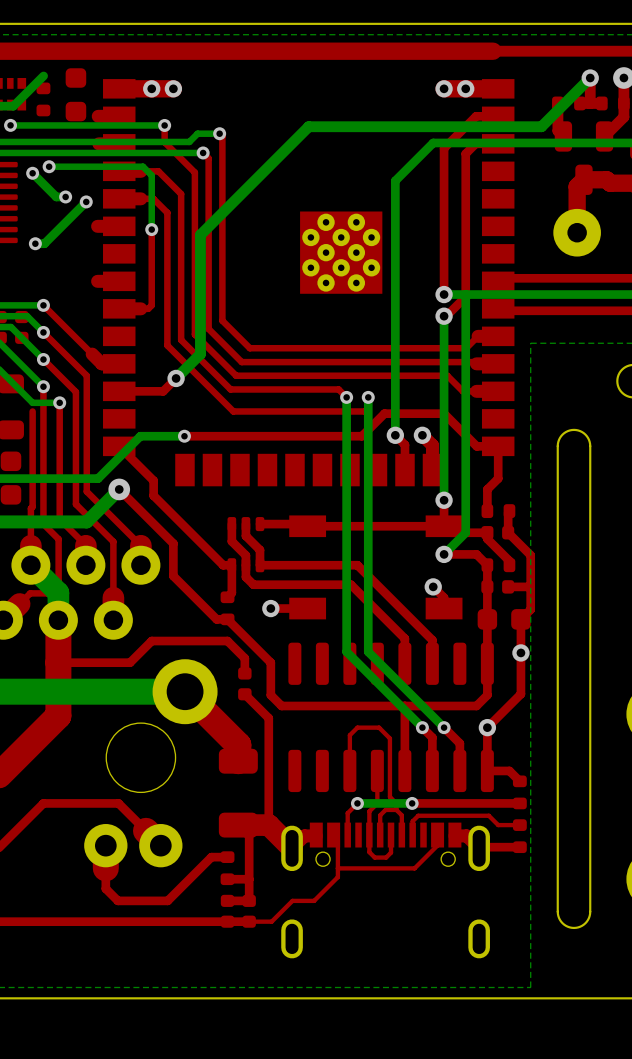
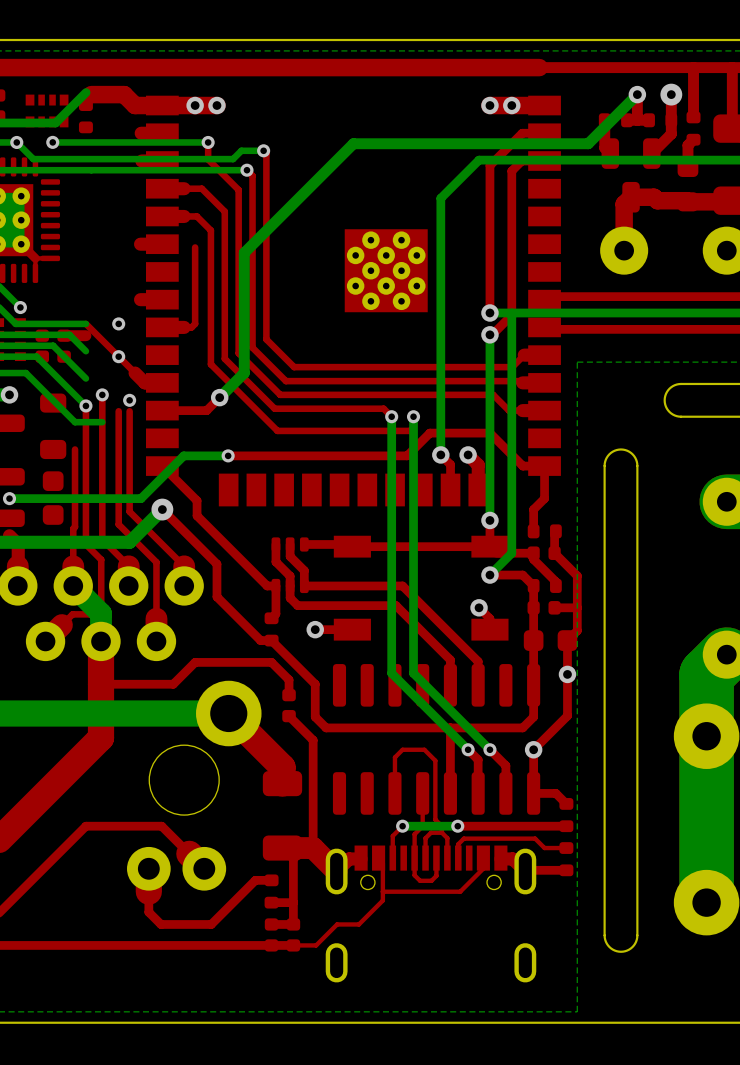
top track: none -> (91, 94) (124, 94) (135, 105) (162, 105)
part: (75, 94) -> none
bottom track: (49, 166) (143, 166) (151, 175) (151, 229) -> none
via: (49, 166) -> none
bottom track: (32, 173) (56, 196) (65, 196) -> none
via: (32, 173) -> none
via: (65, 196) -> none
bottom track: (86, 201) (44, 243) (35, 243) -> none
via: (86, 201) -> none
via: (151, 229) -> none
via: (35, 243) -> none
via: (43, 305) -> none
via: none -> (118, 323)
top track: none -> (85, 335) (64, 335)
top track: (43, 332) (86, 375) (86, 391) -> none
via: (43, 332) -> none
via: none -> (118, 356)
top track: (43, 359) (75, 391) -> none
via: (43, 359) -> none
top track: none -> (102, 394) (102, 422)
via: none -> (102, 394)
via: none -> (129, 400)
via: (59, 402) -> none
top track: (32, 411) (32, 429) -> none

